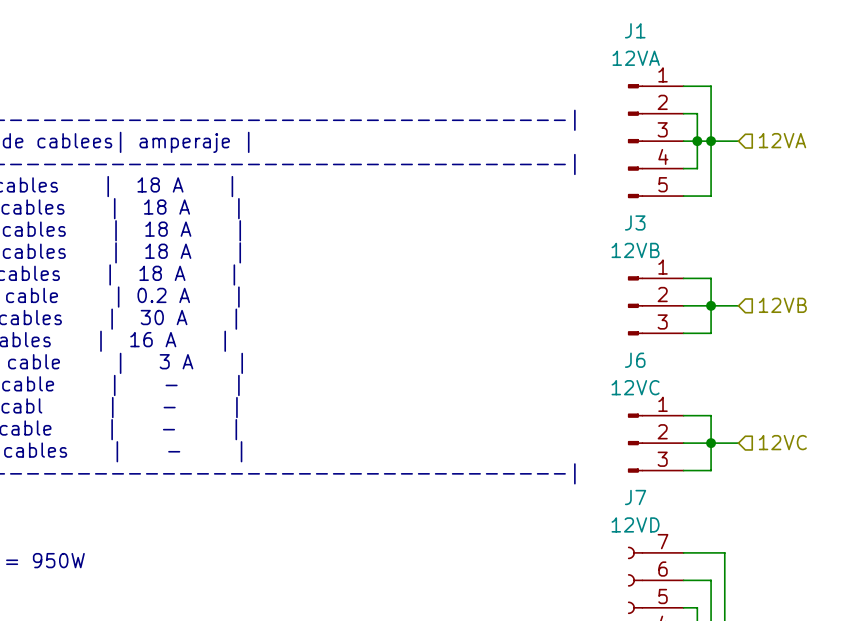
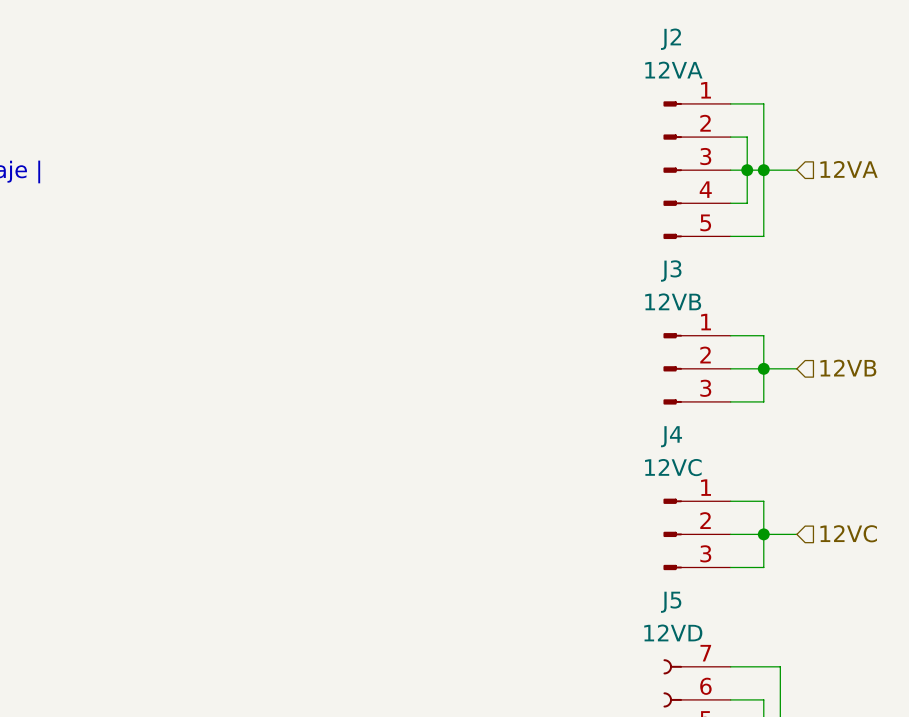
J1 name: J1 (635, 30) -> J2 (671, 39)
J6 name: J6 (635, 360) -> J4 (671, 436)
J7 name: J7 (635, 497) -> J5 (671, 602)

